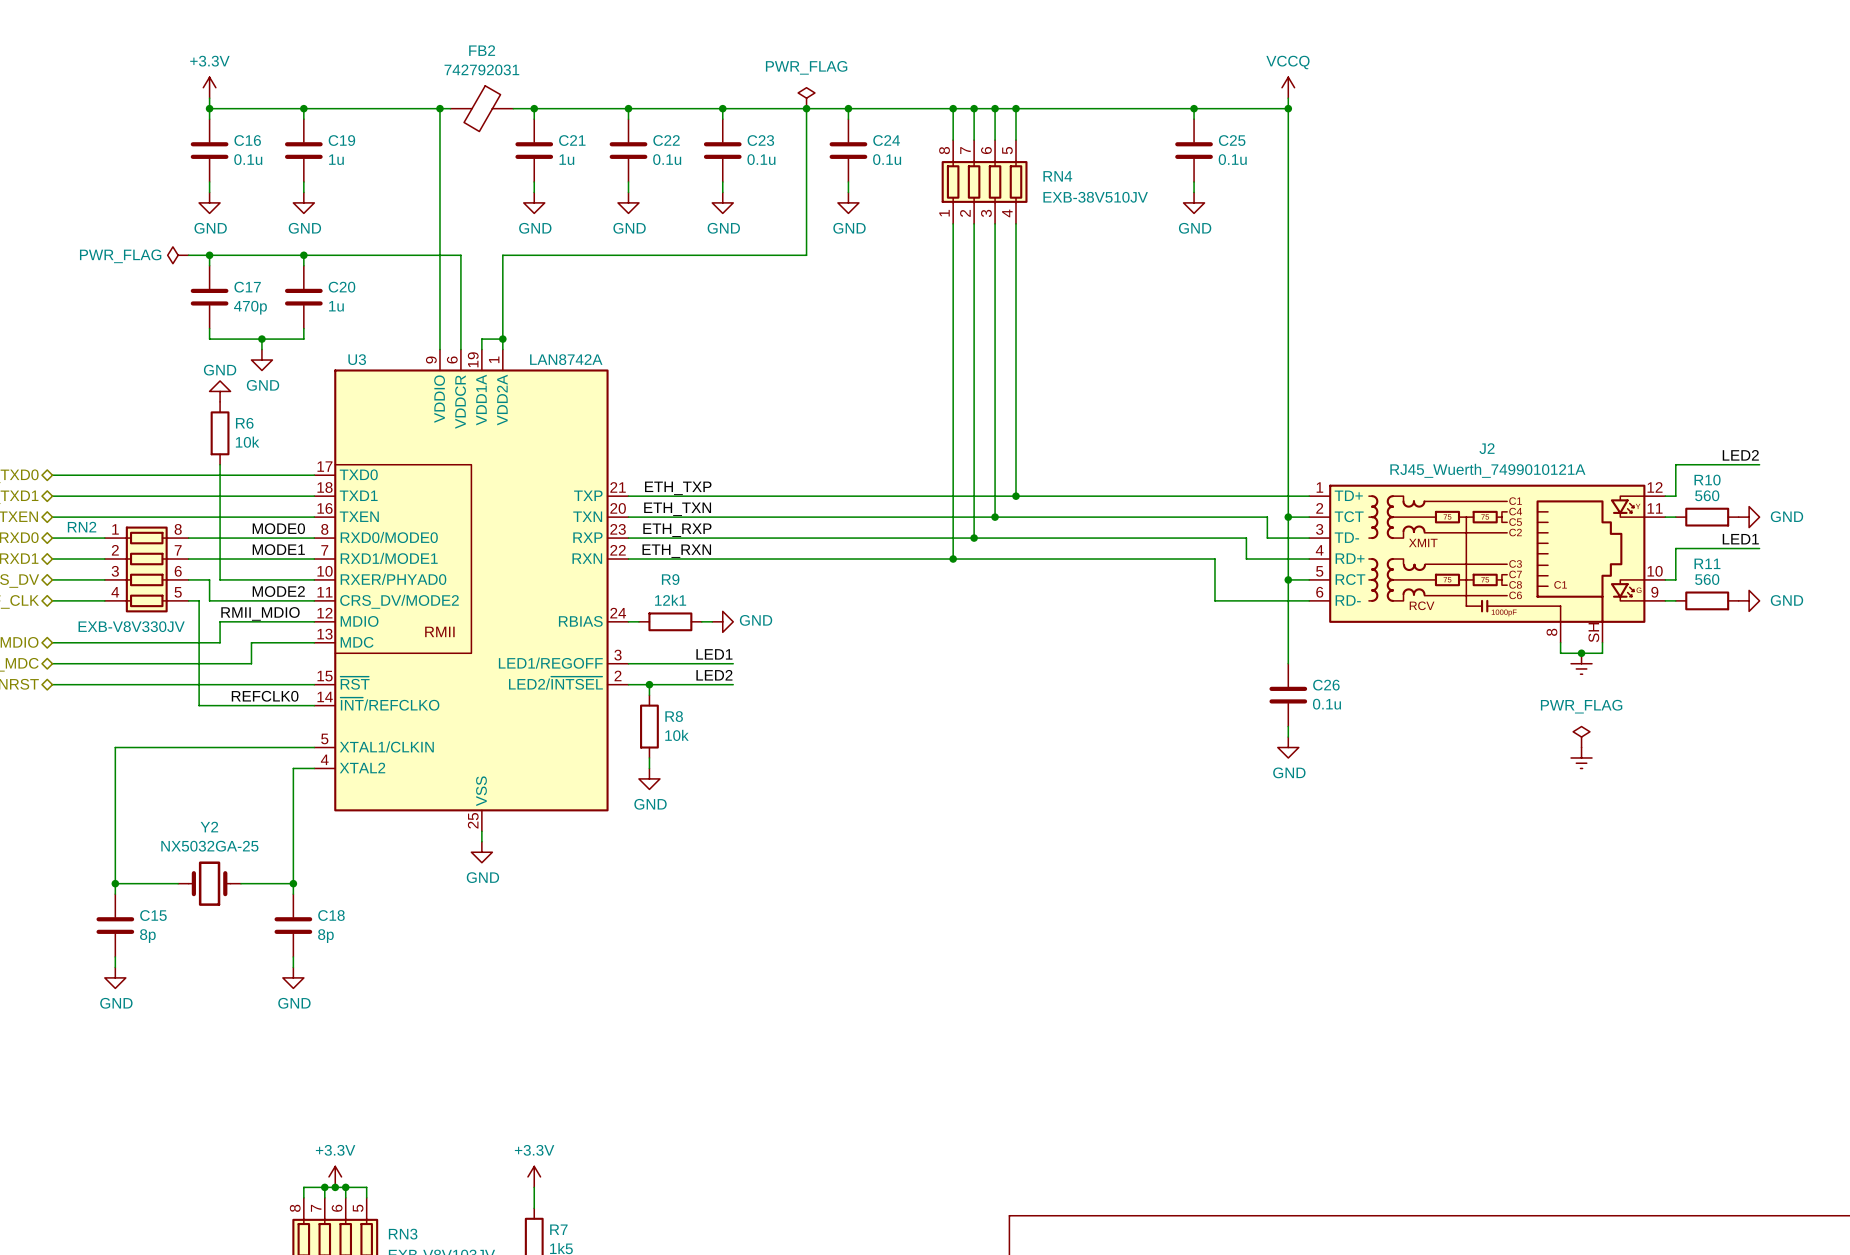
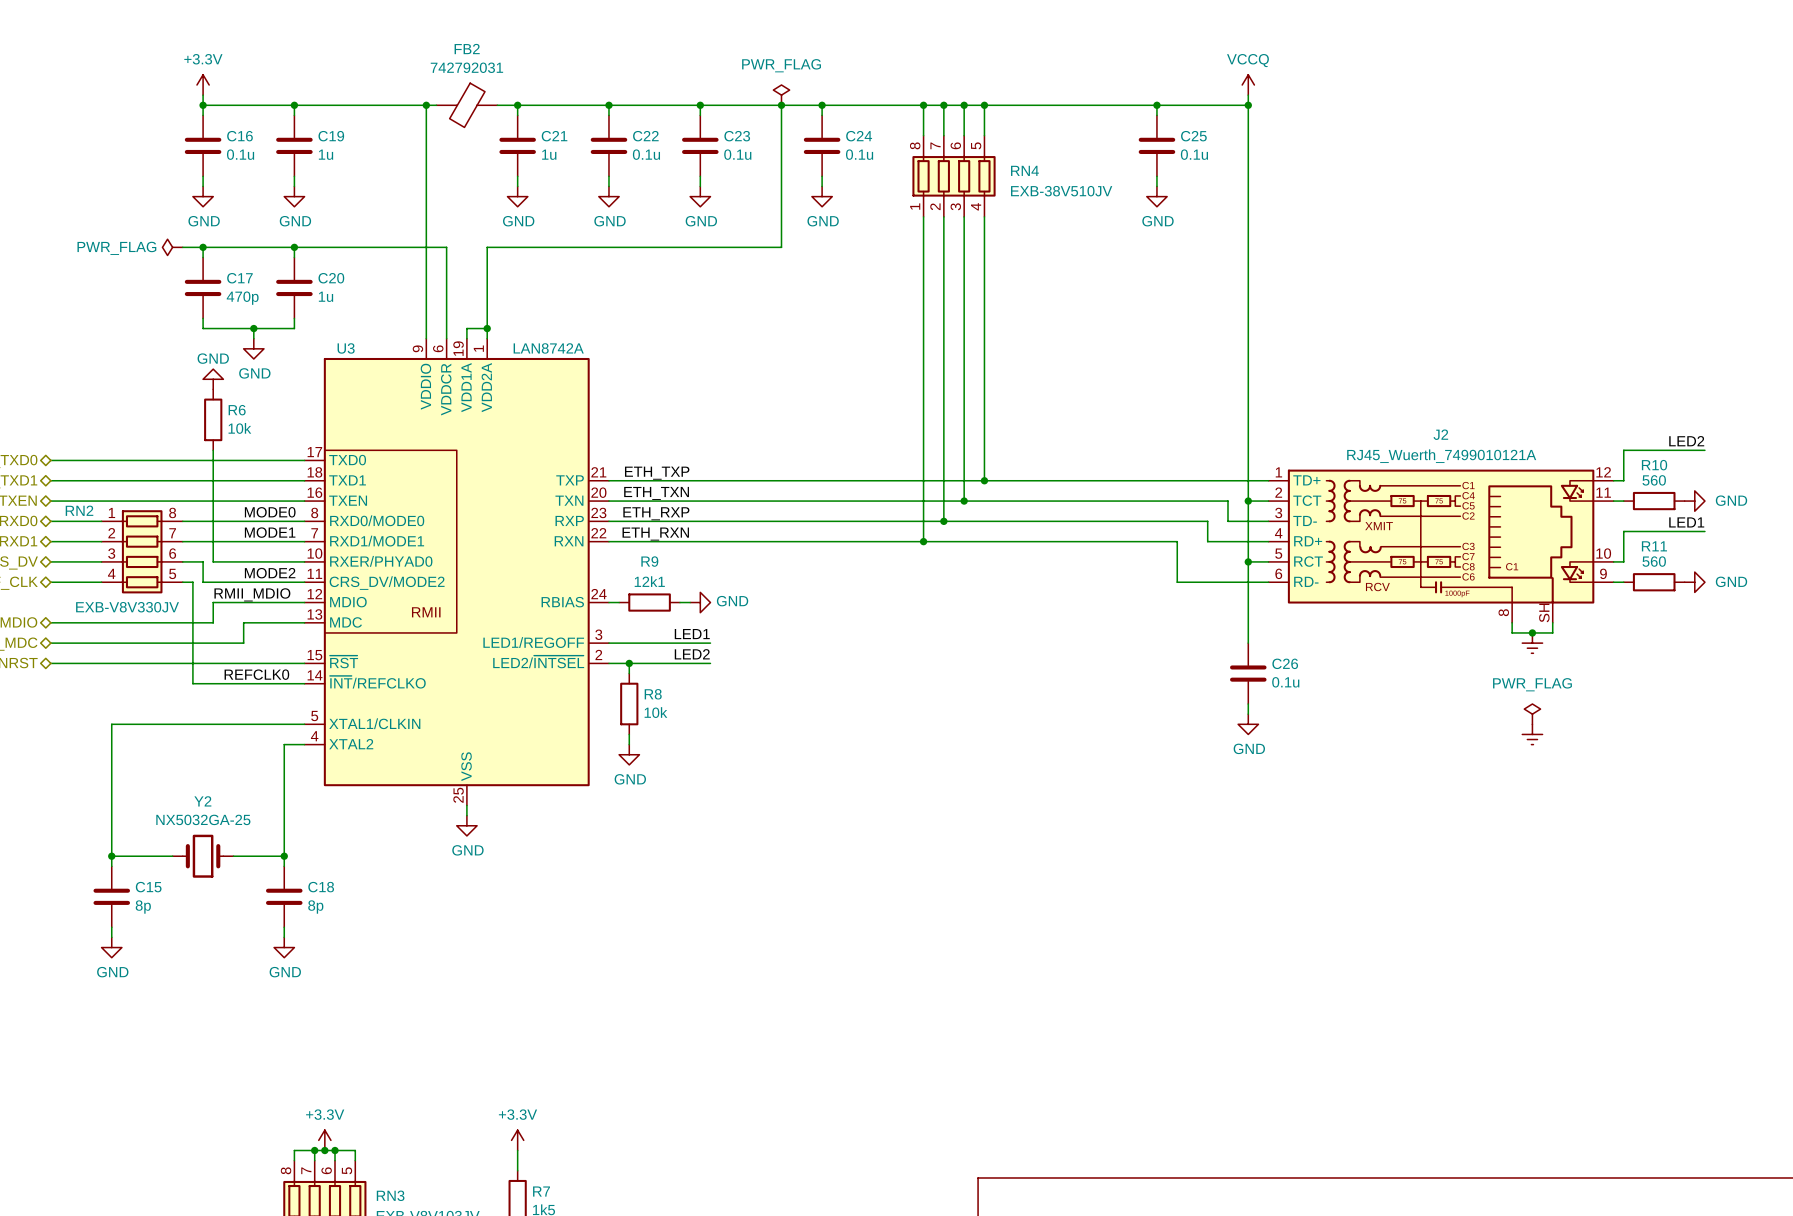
J2 symbol: [1309, 484, 1666, 643] -> [1268, 469, 1614, 623]

